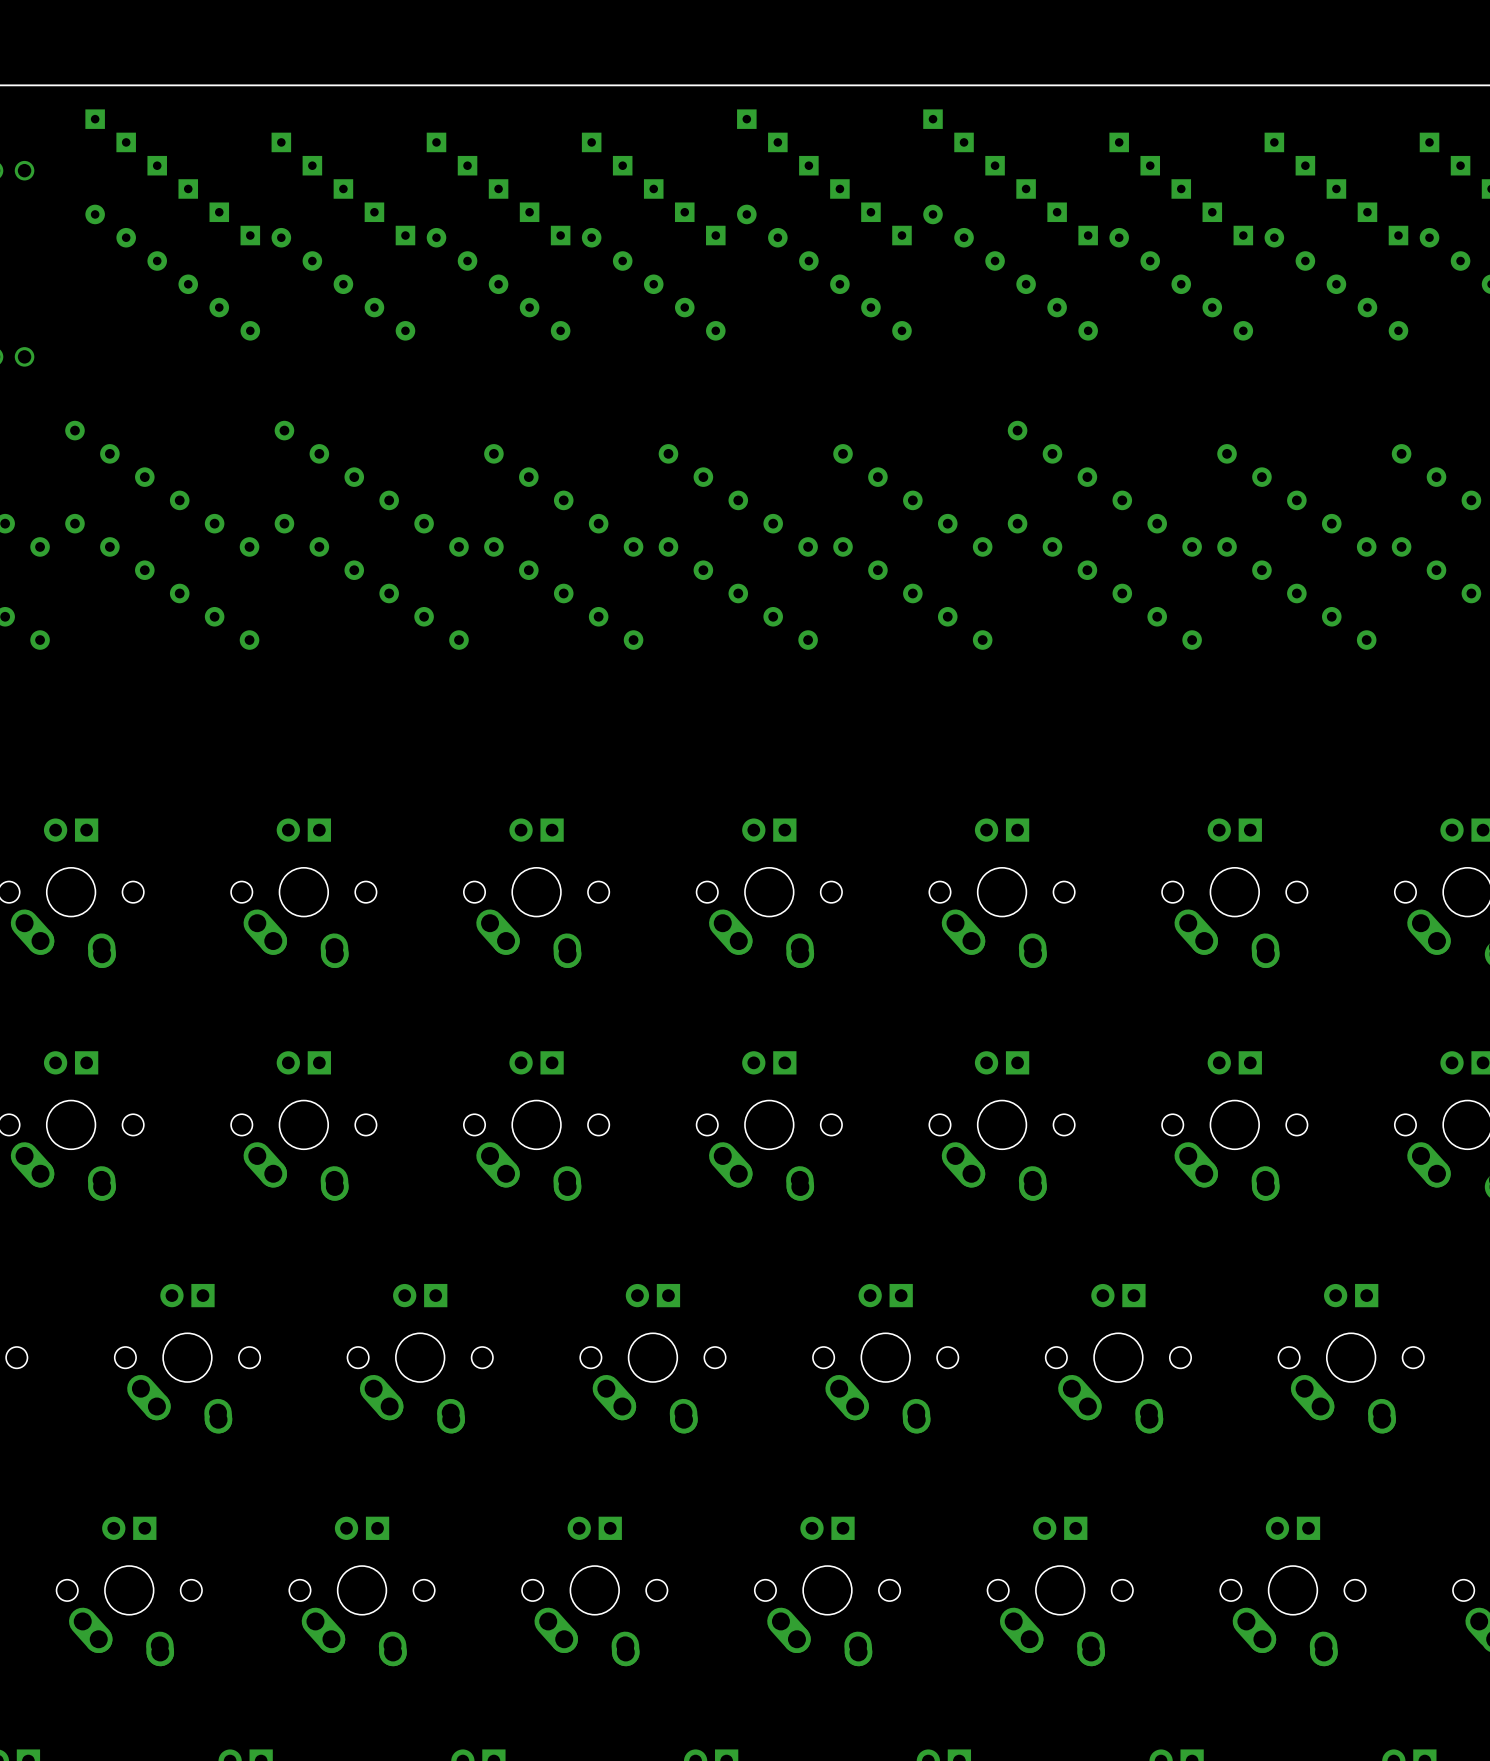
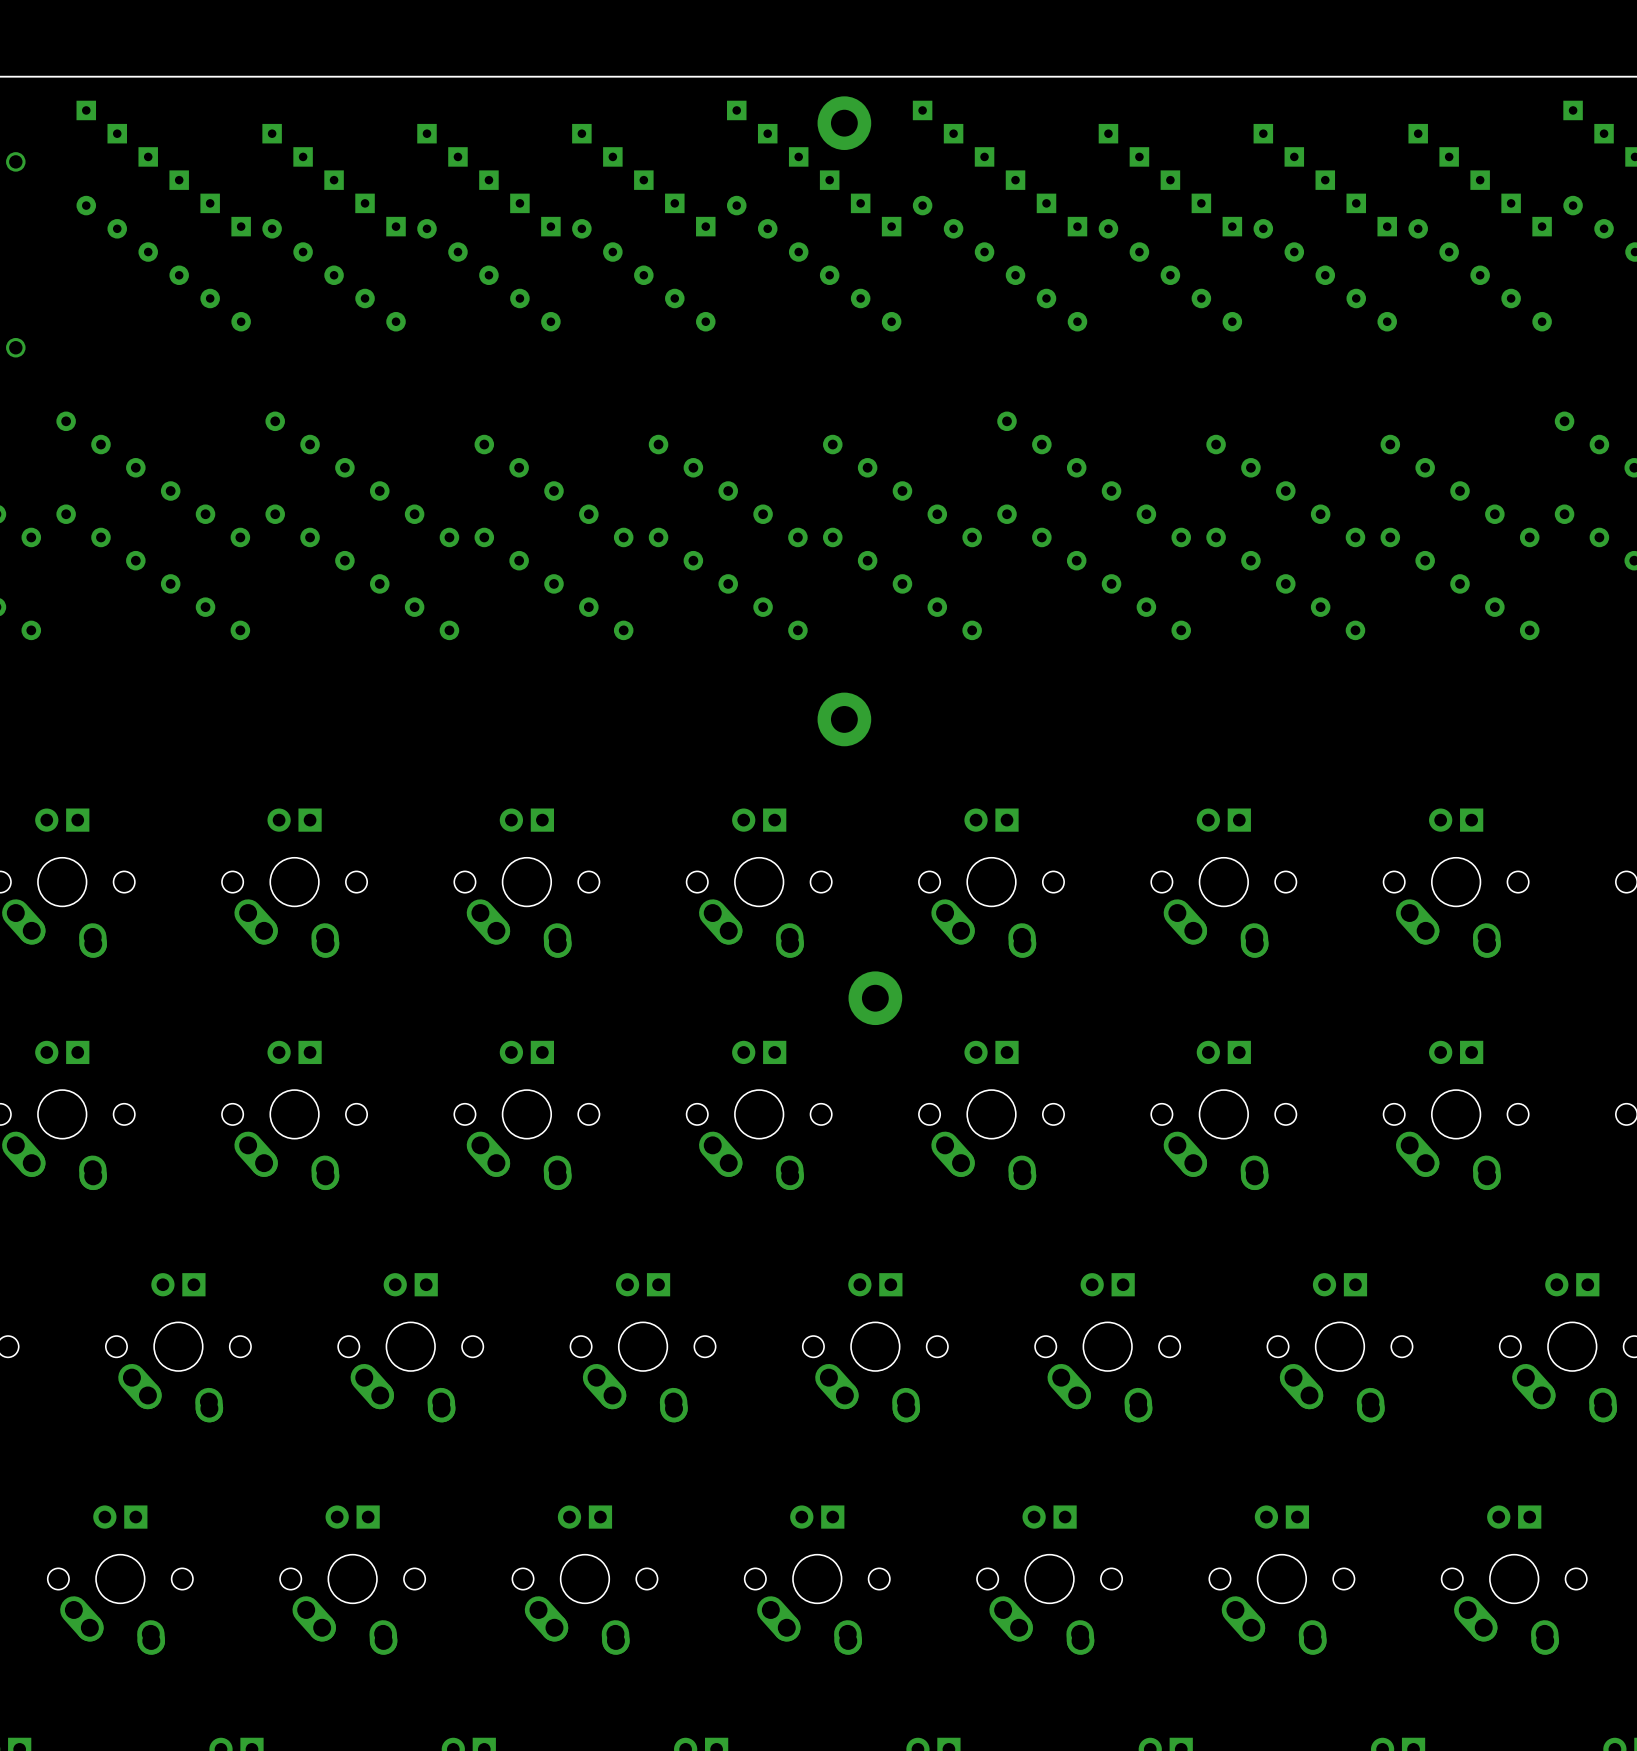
part: none -> (844, 123)
part: none -> (844, 719)
part: none -> (875, 998)

